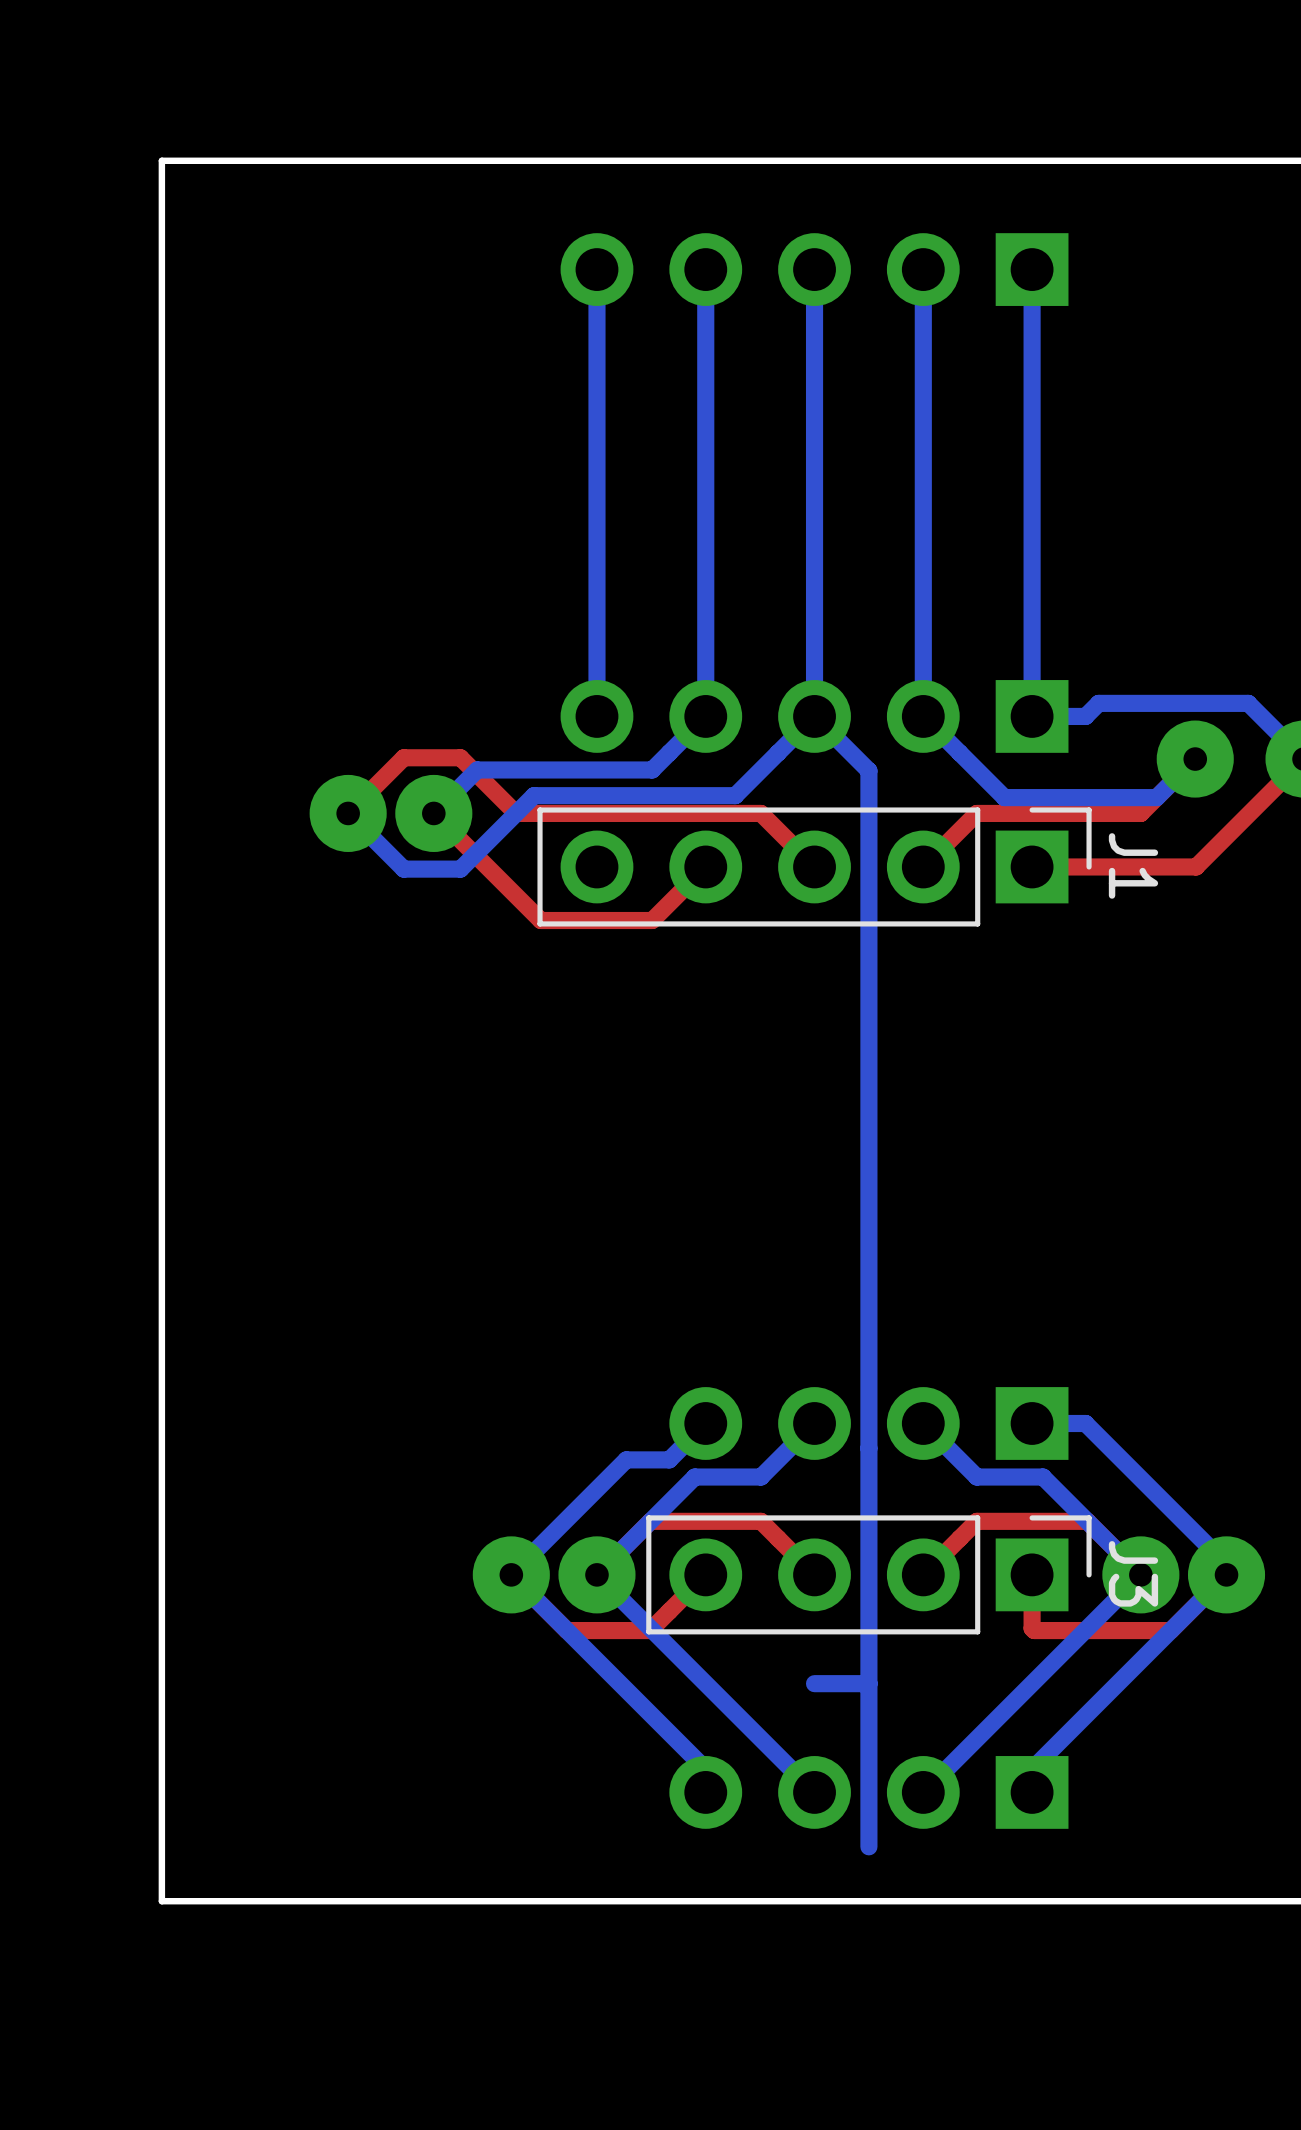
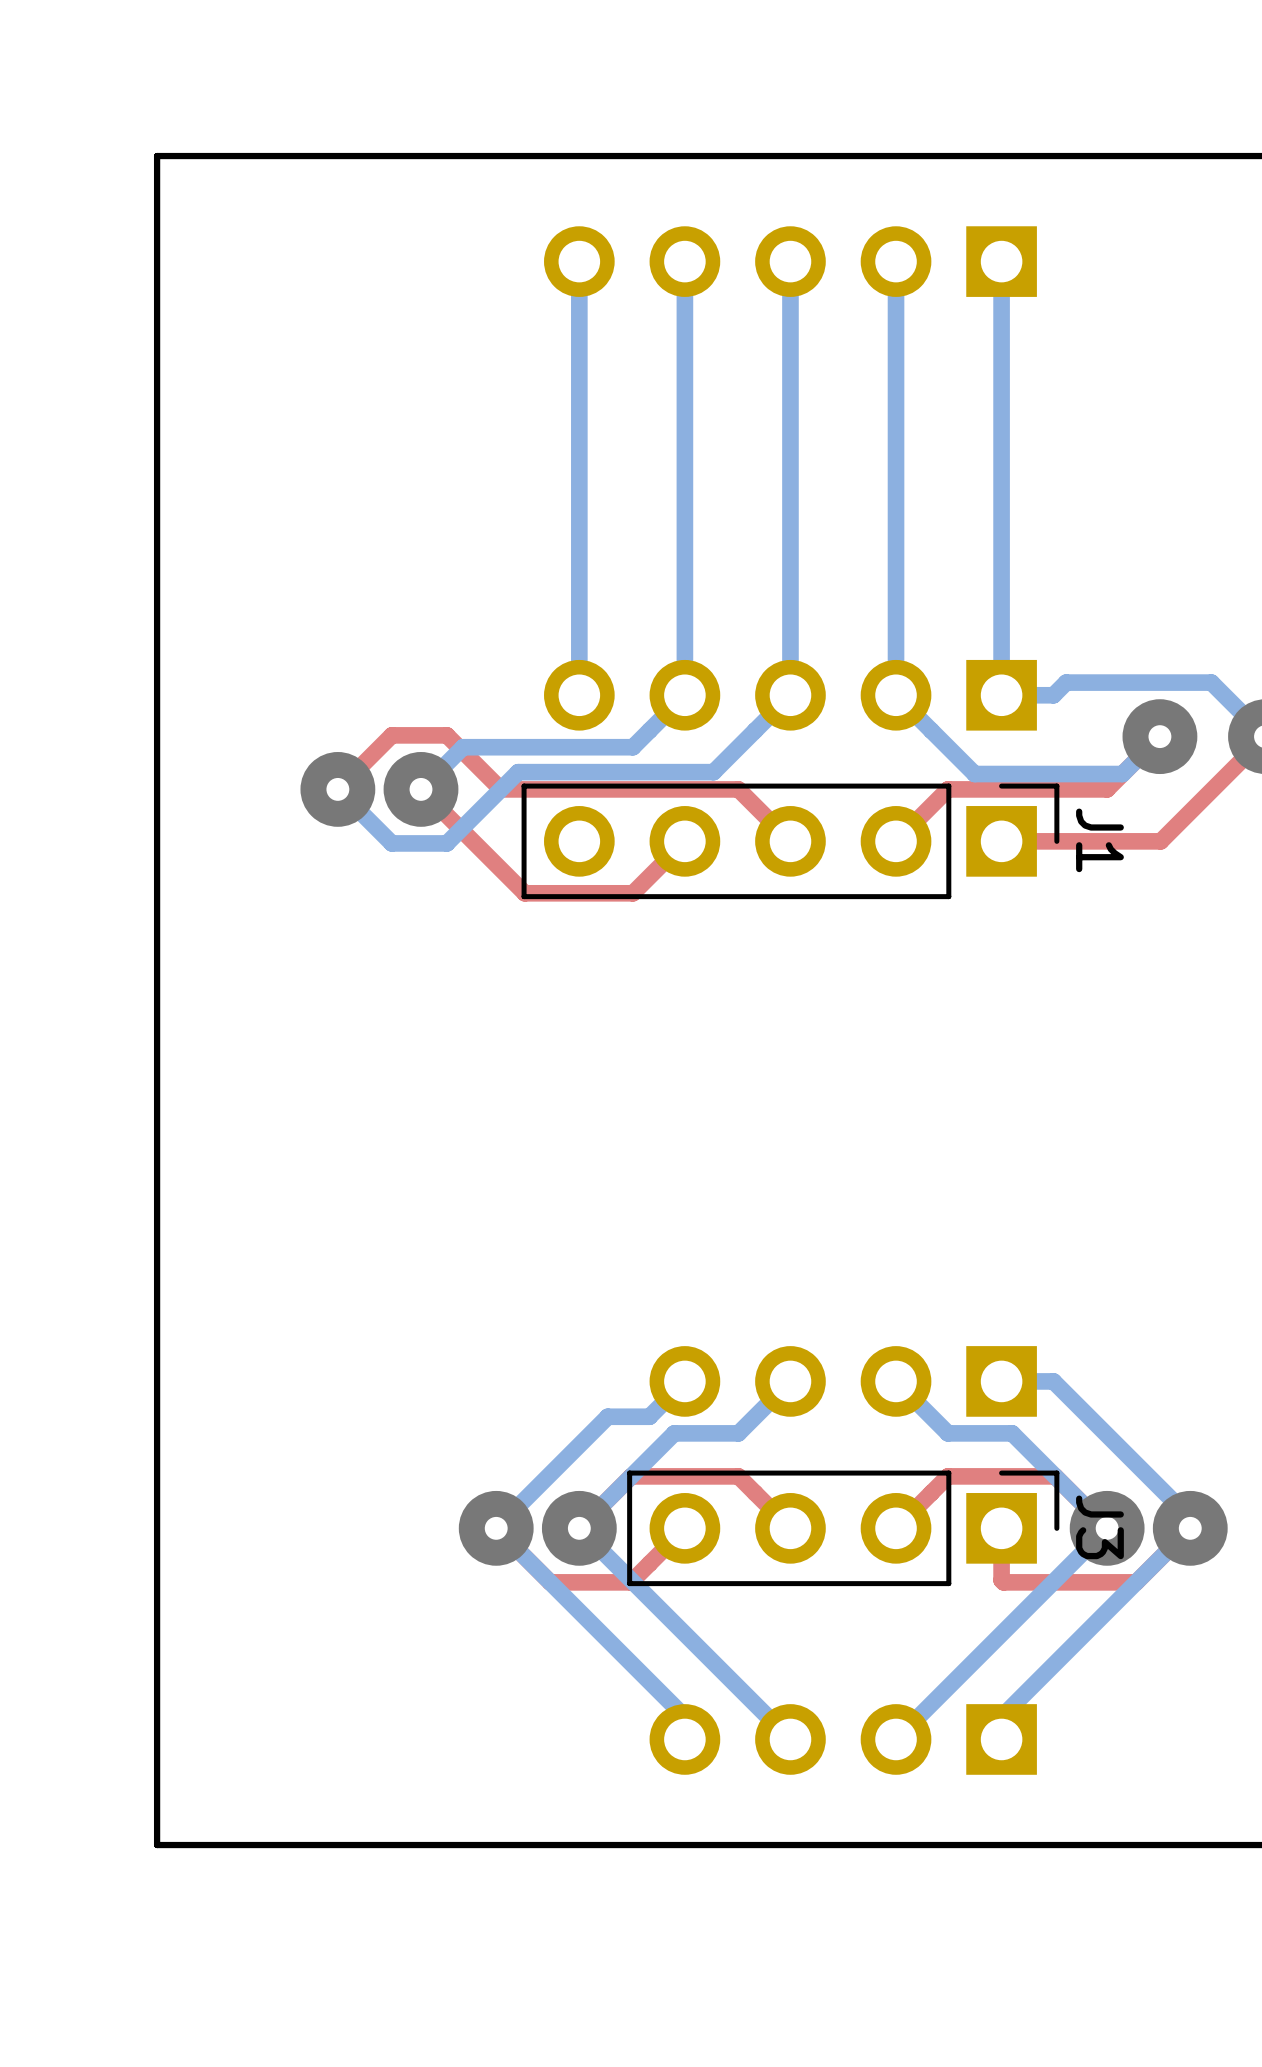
bottom track: (814, 716) (868, 770) (868, 1846) -> none
bottom track: (868, 1683) (814, 1683) -> none

